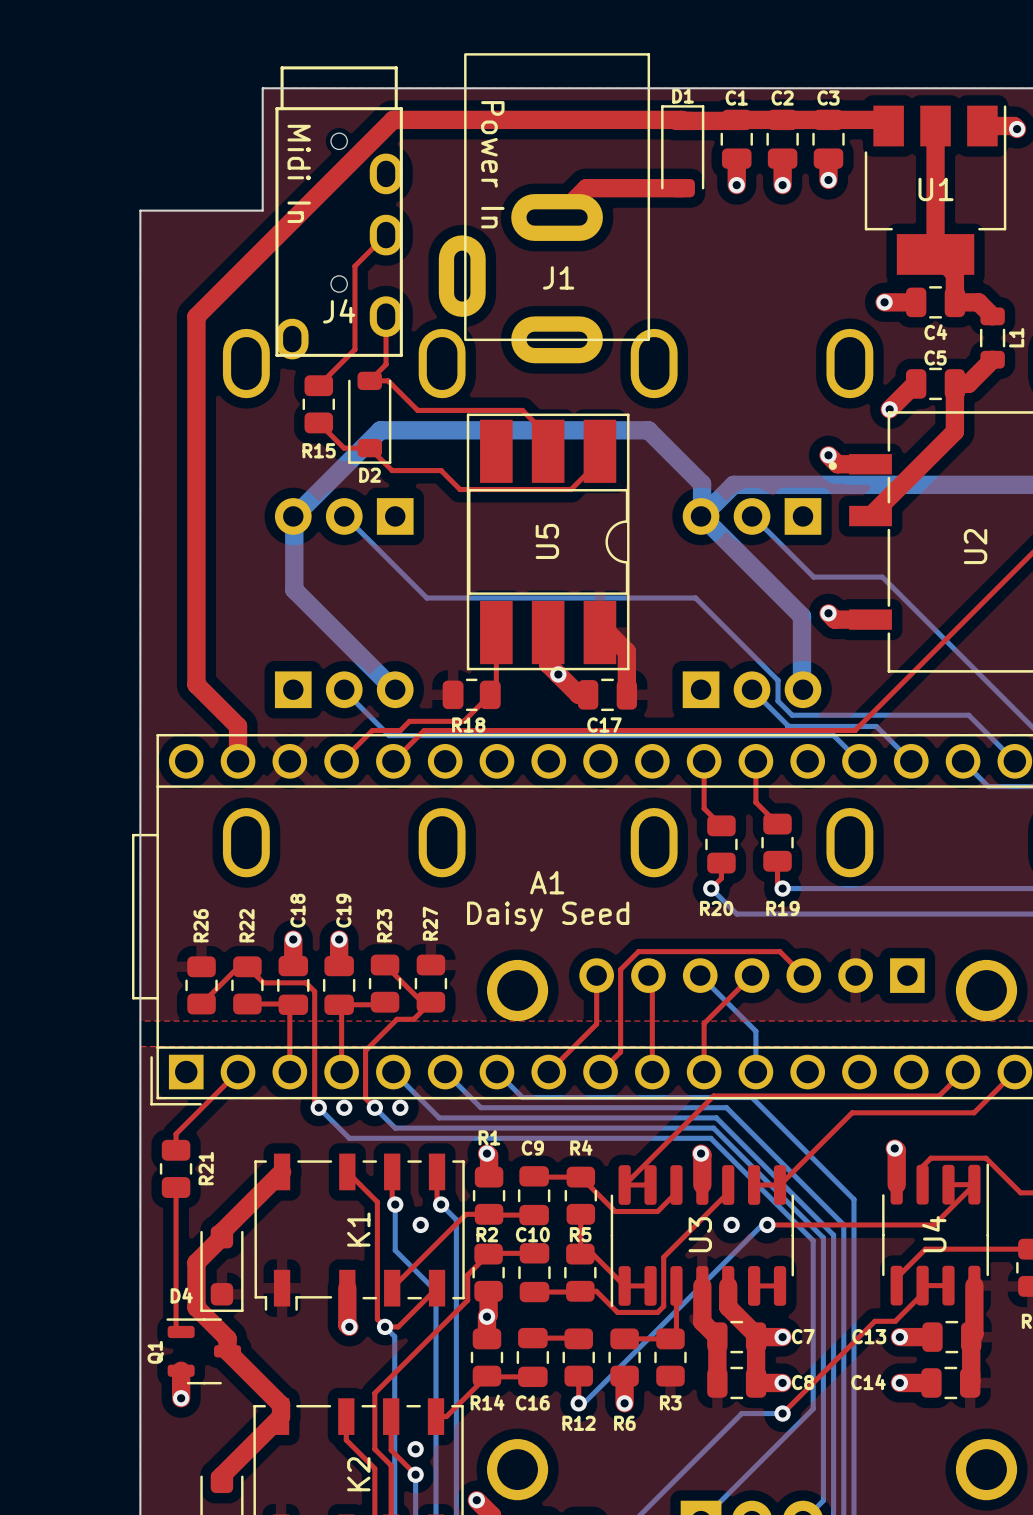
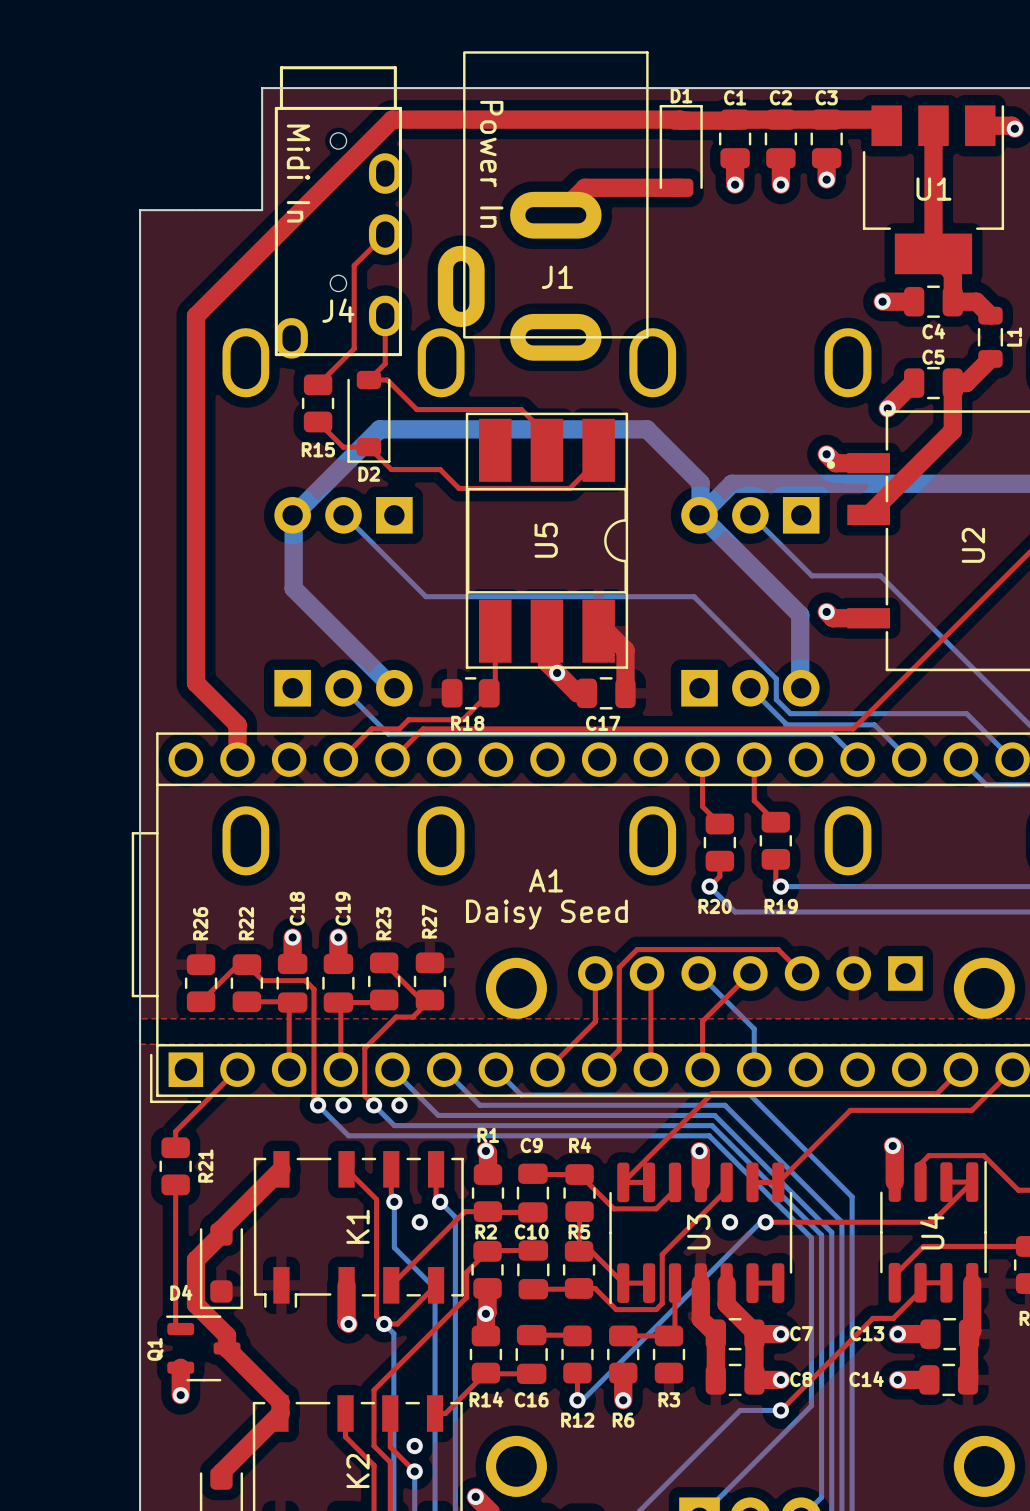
J1 footprint: [438, 53, 651, 364] -> [437, 51, 649, 361]

